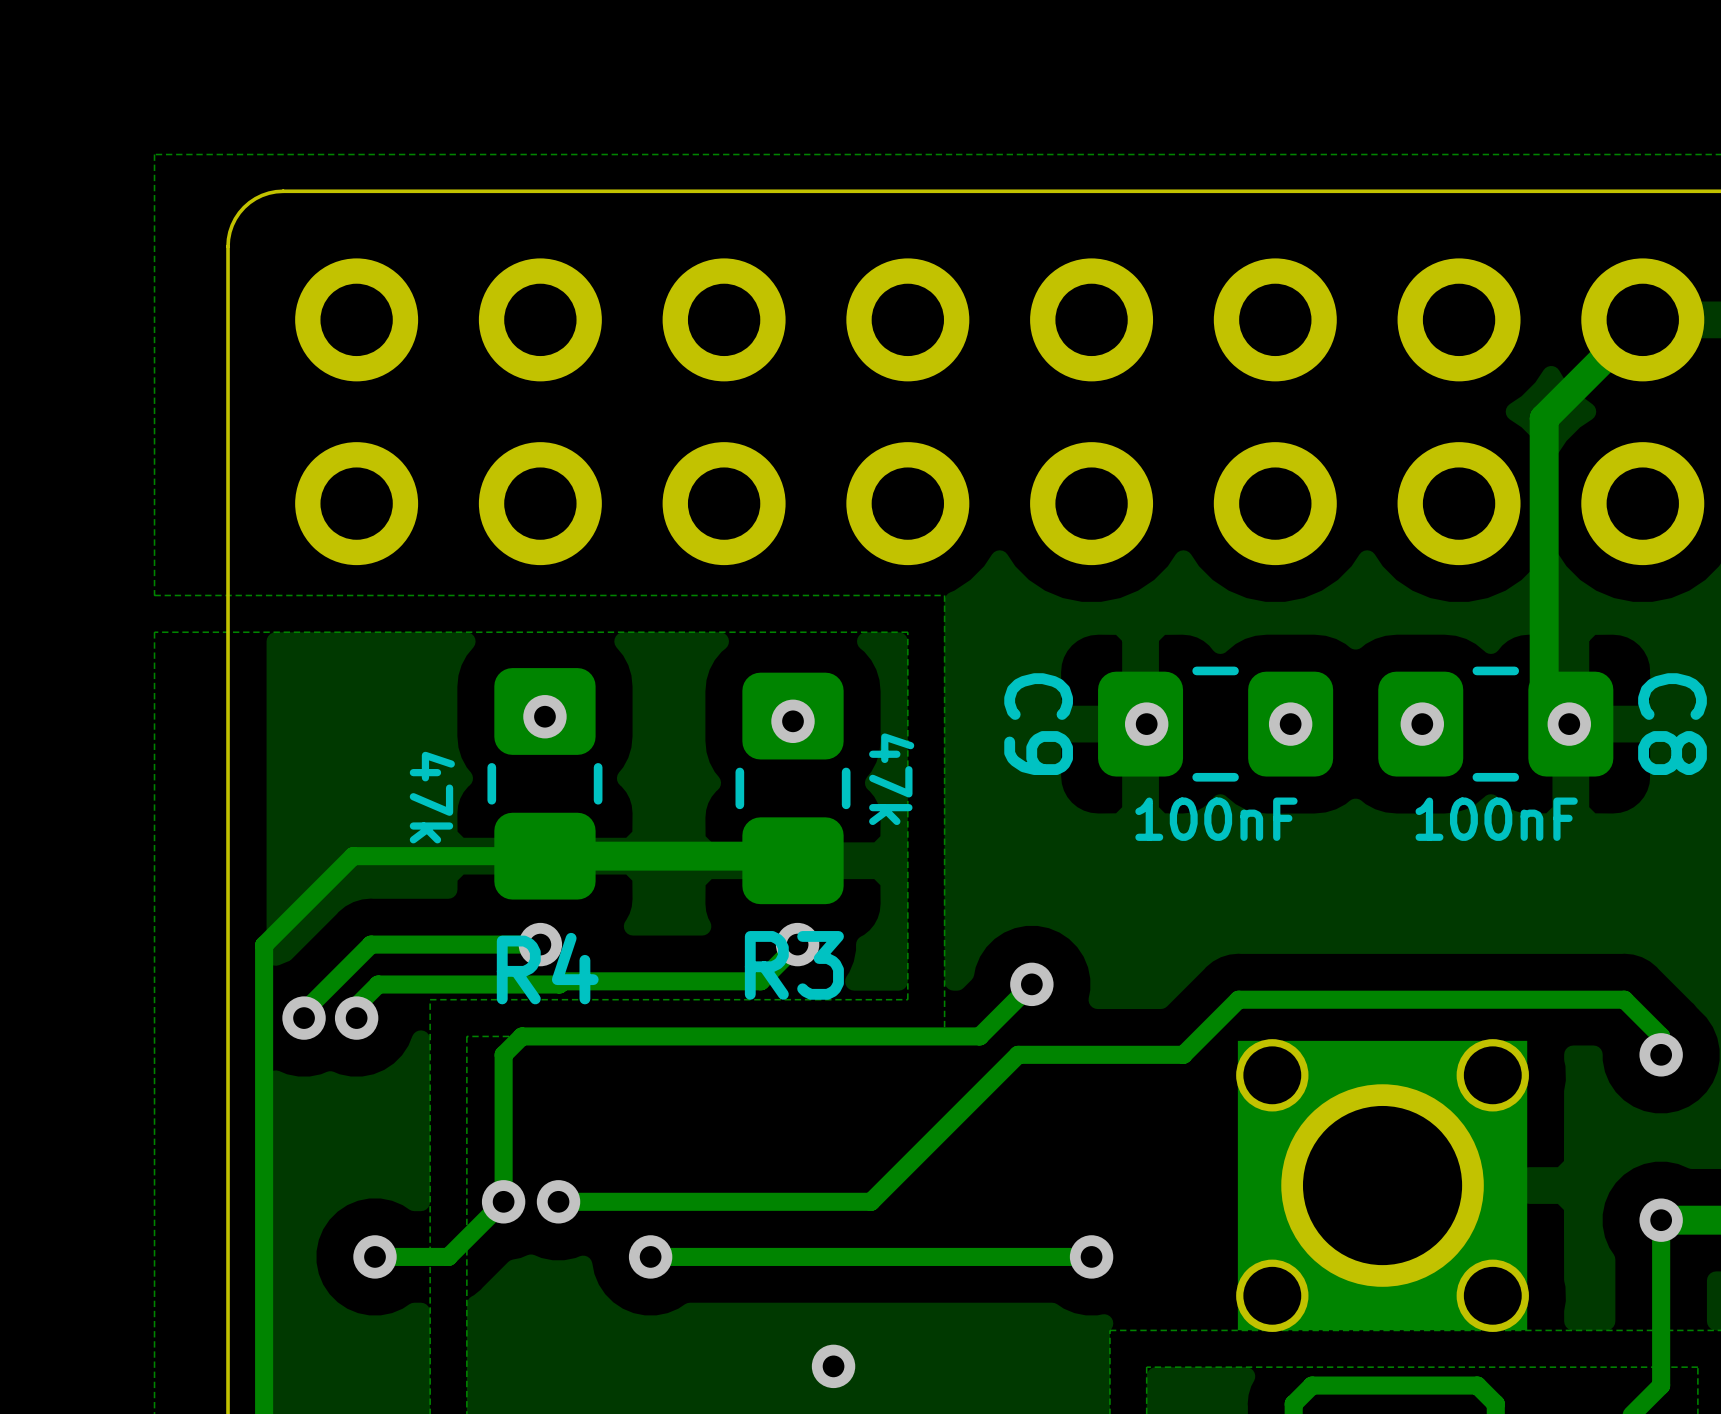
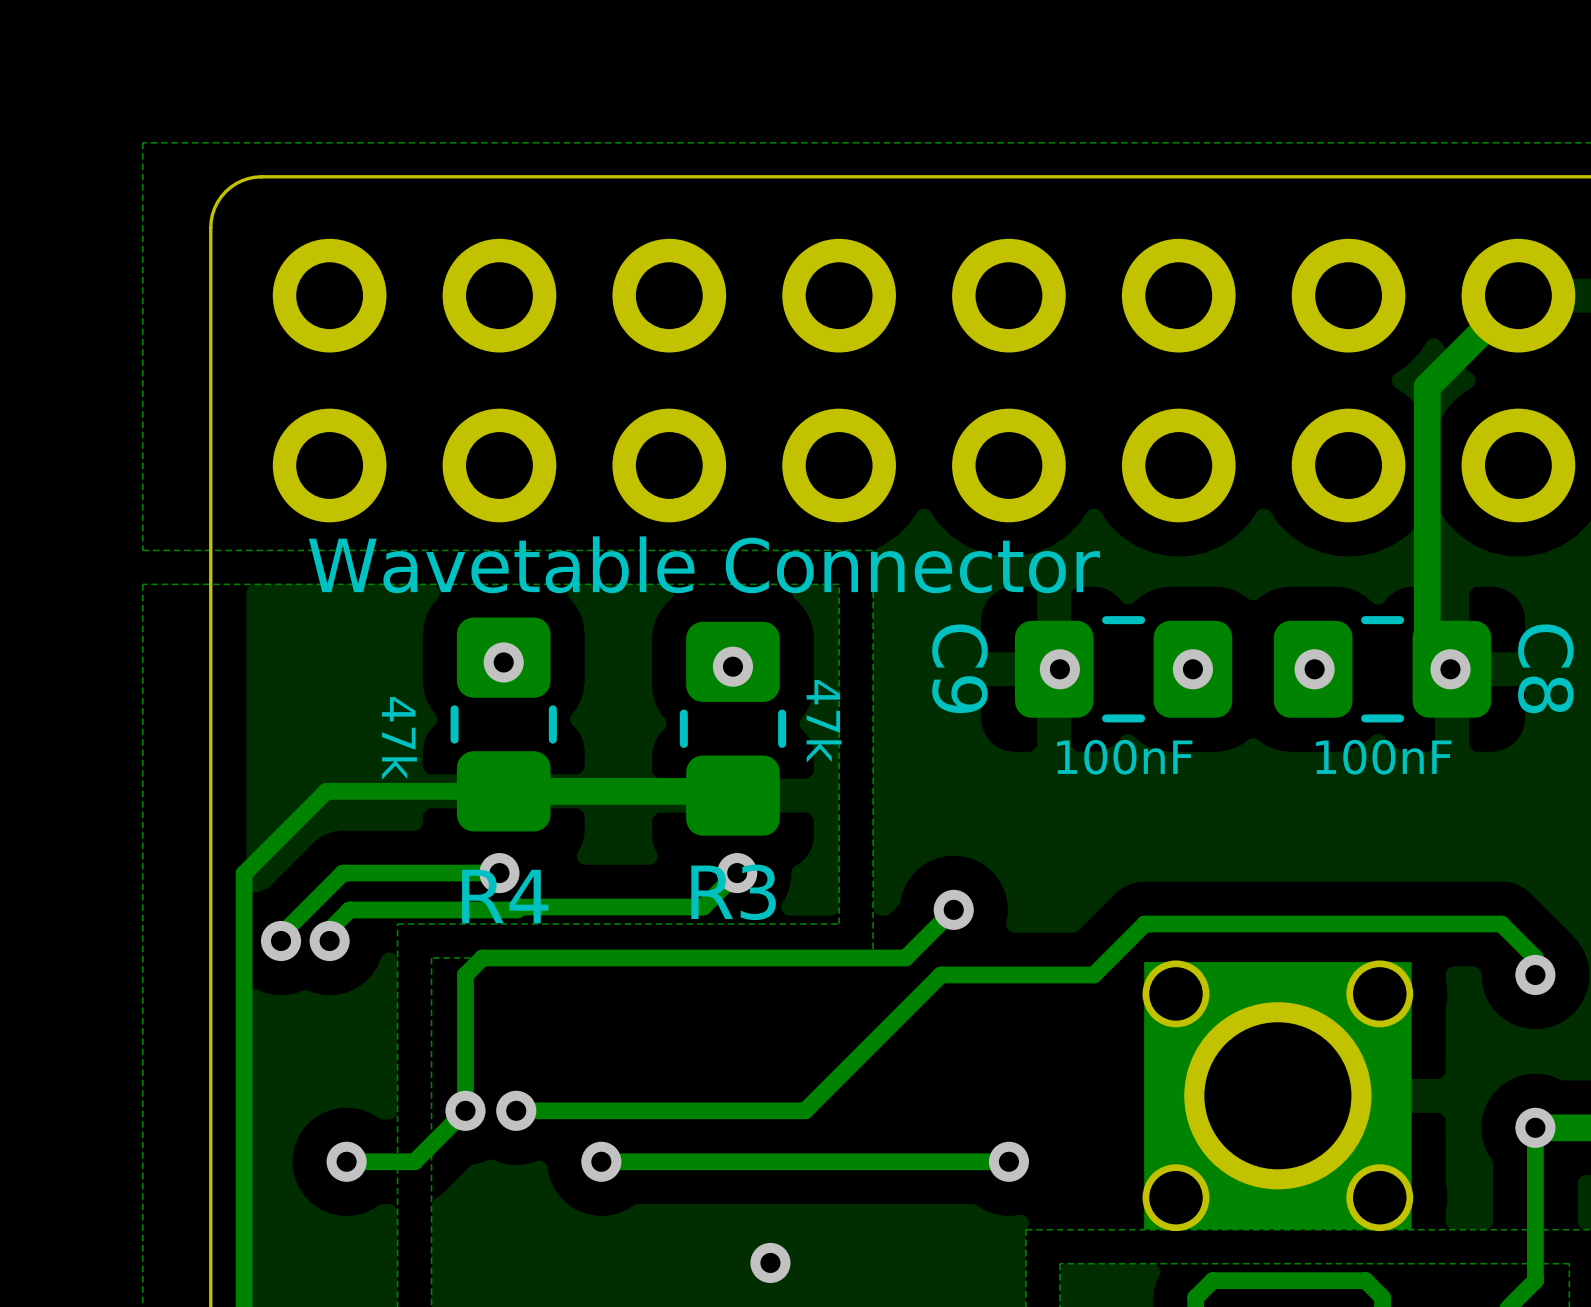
part value: none -> Wavetable Connector (704, 564)

